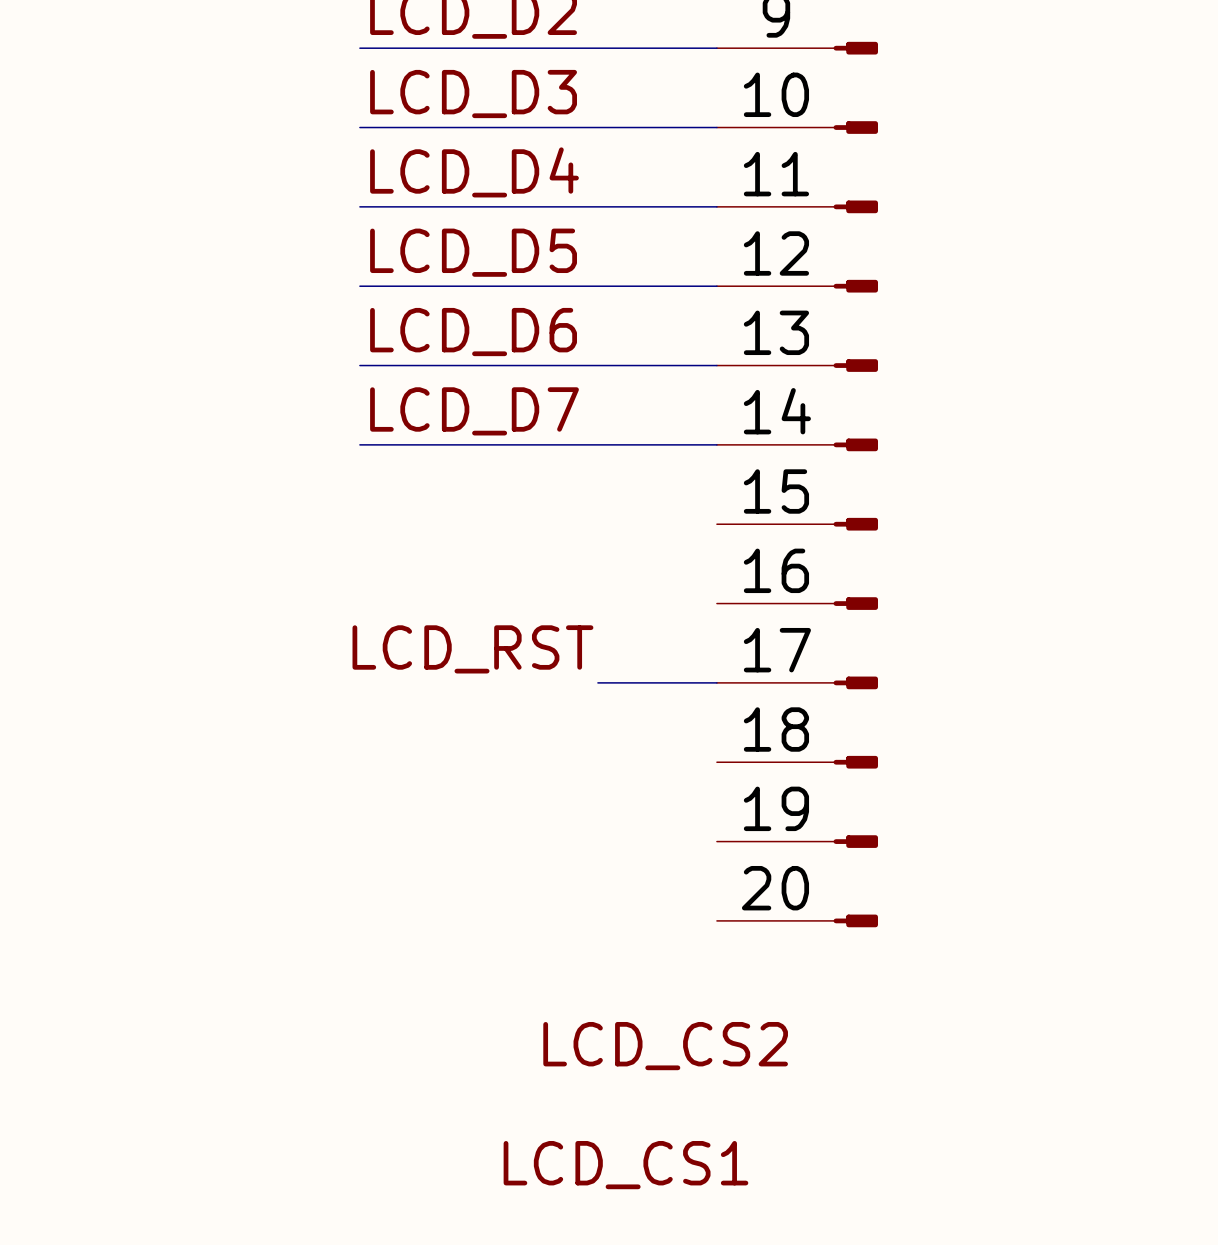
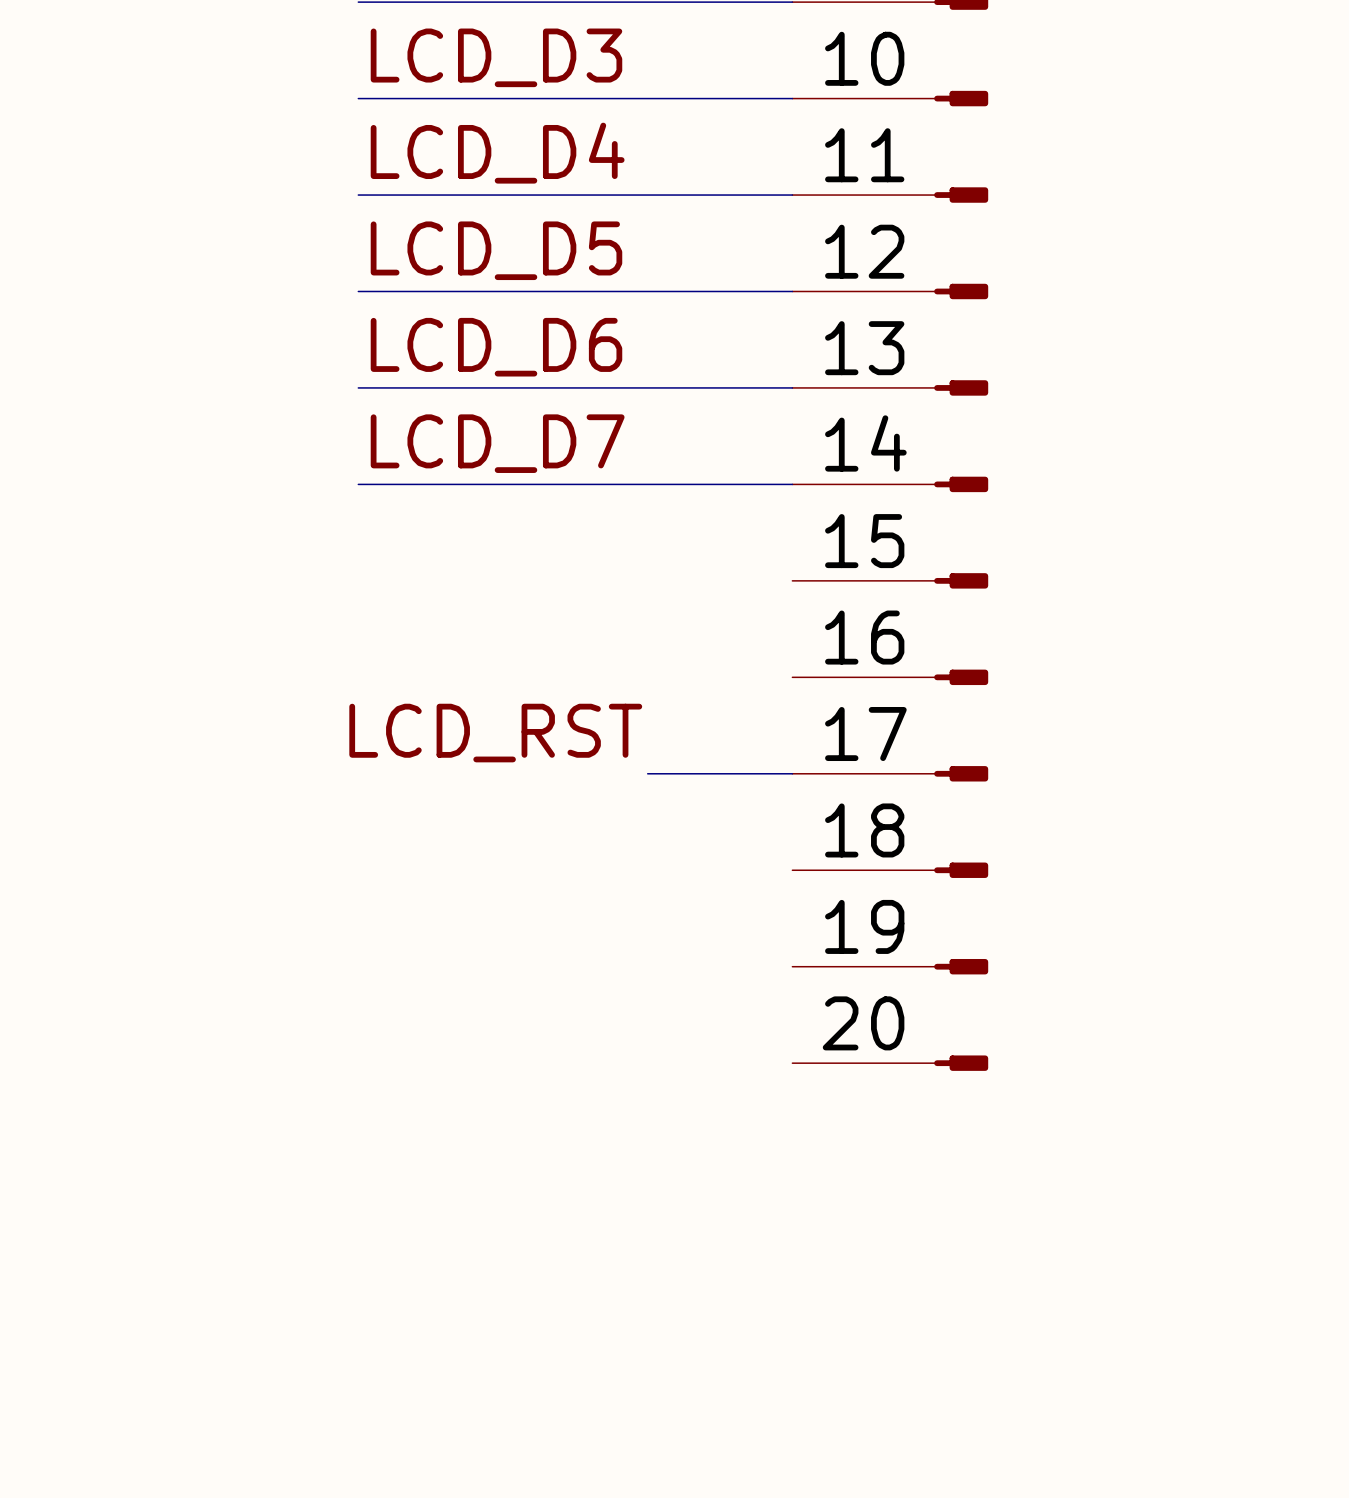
label: LCD_CS2 (665, 1046) -> none
label: LCD_CS1 (625, 1165) -> none

